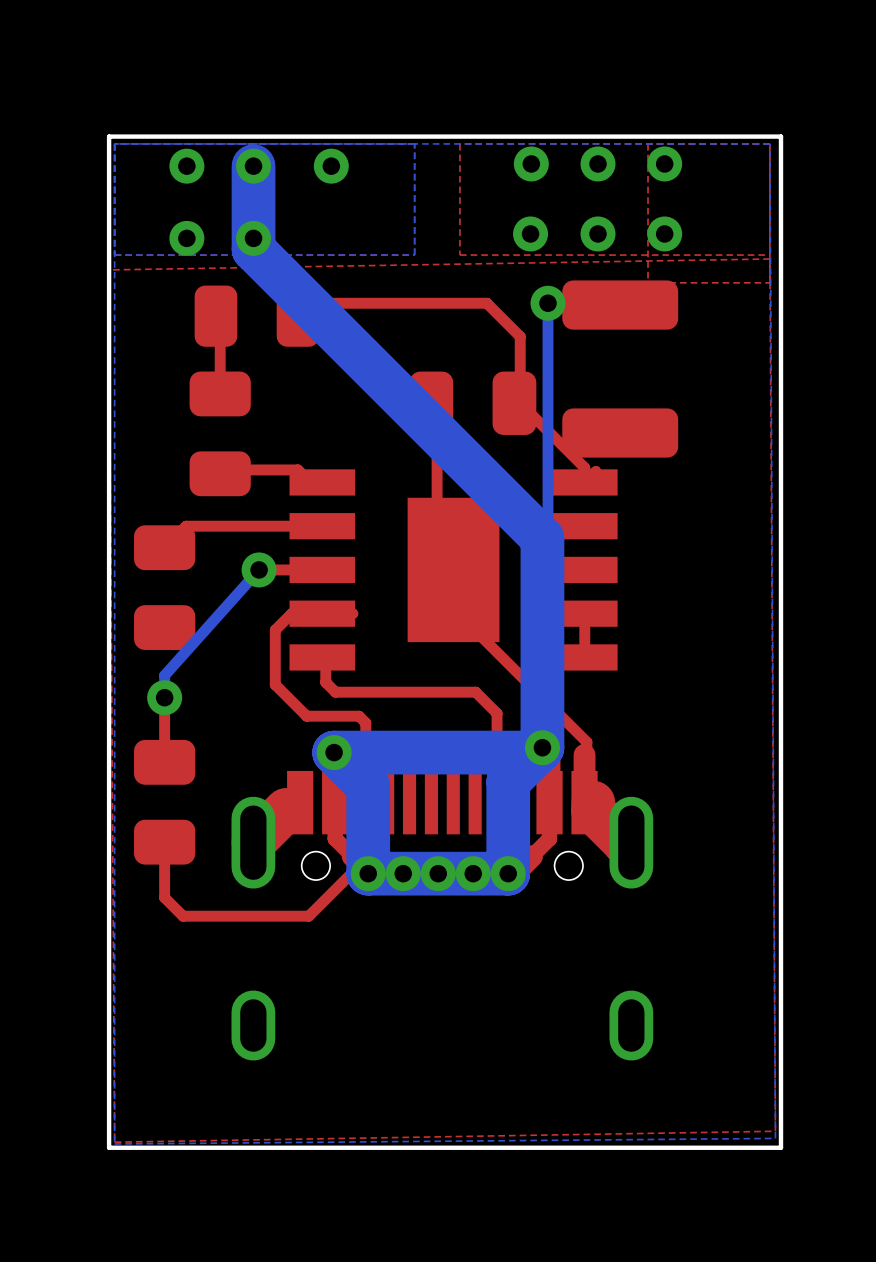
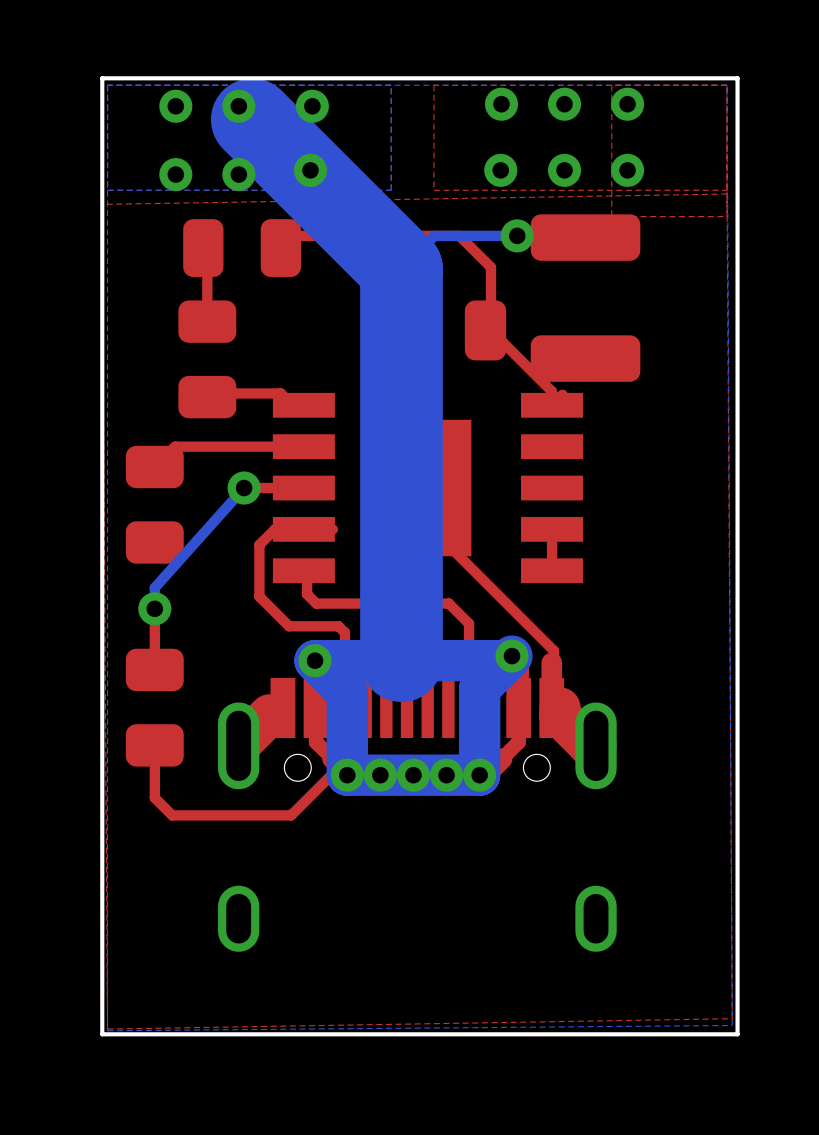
bottom track: (253, 166) (253, 249) (542, 538) (542, 747) -> none
bottom track: none -> (252, 119) (401, 268)
via: none -> (310, 170)
bottom track: (548, 303) (548, 569) -> (517, 235) (434, 235) (401, 268)
bottom track: none -> (401, 268) (401, 660)

